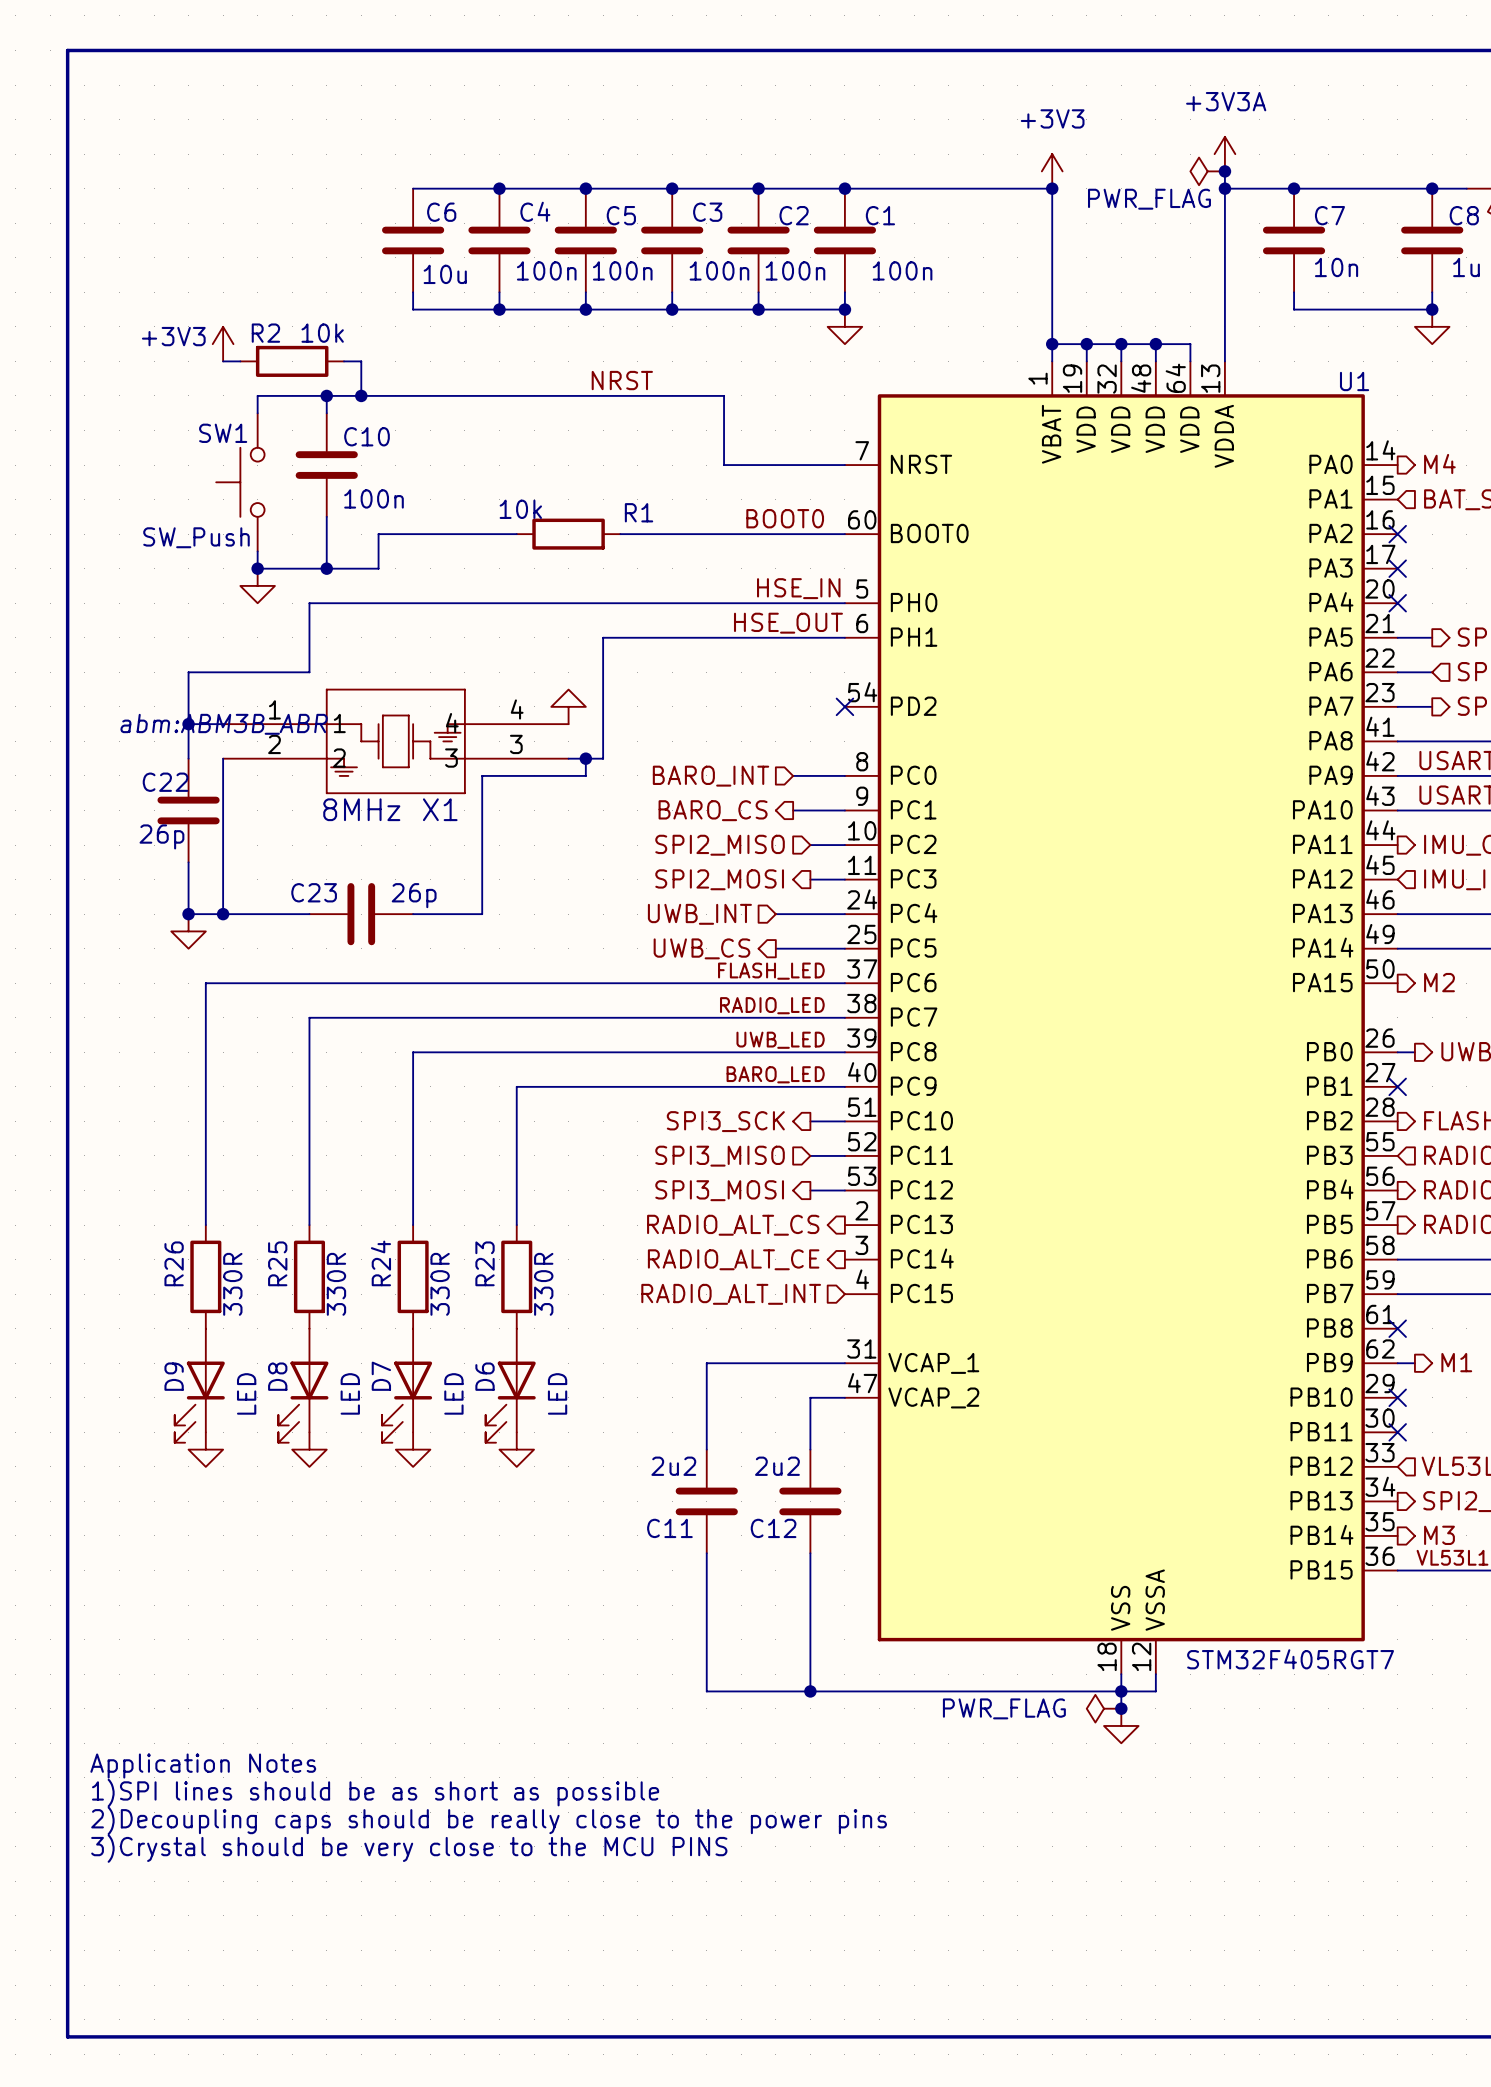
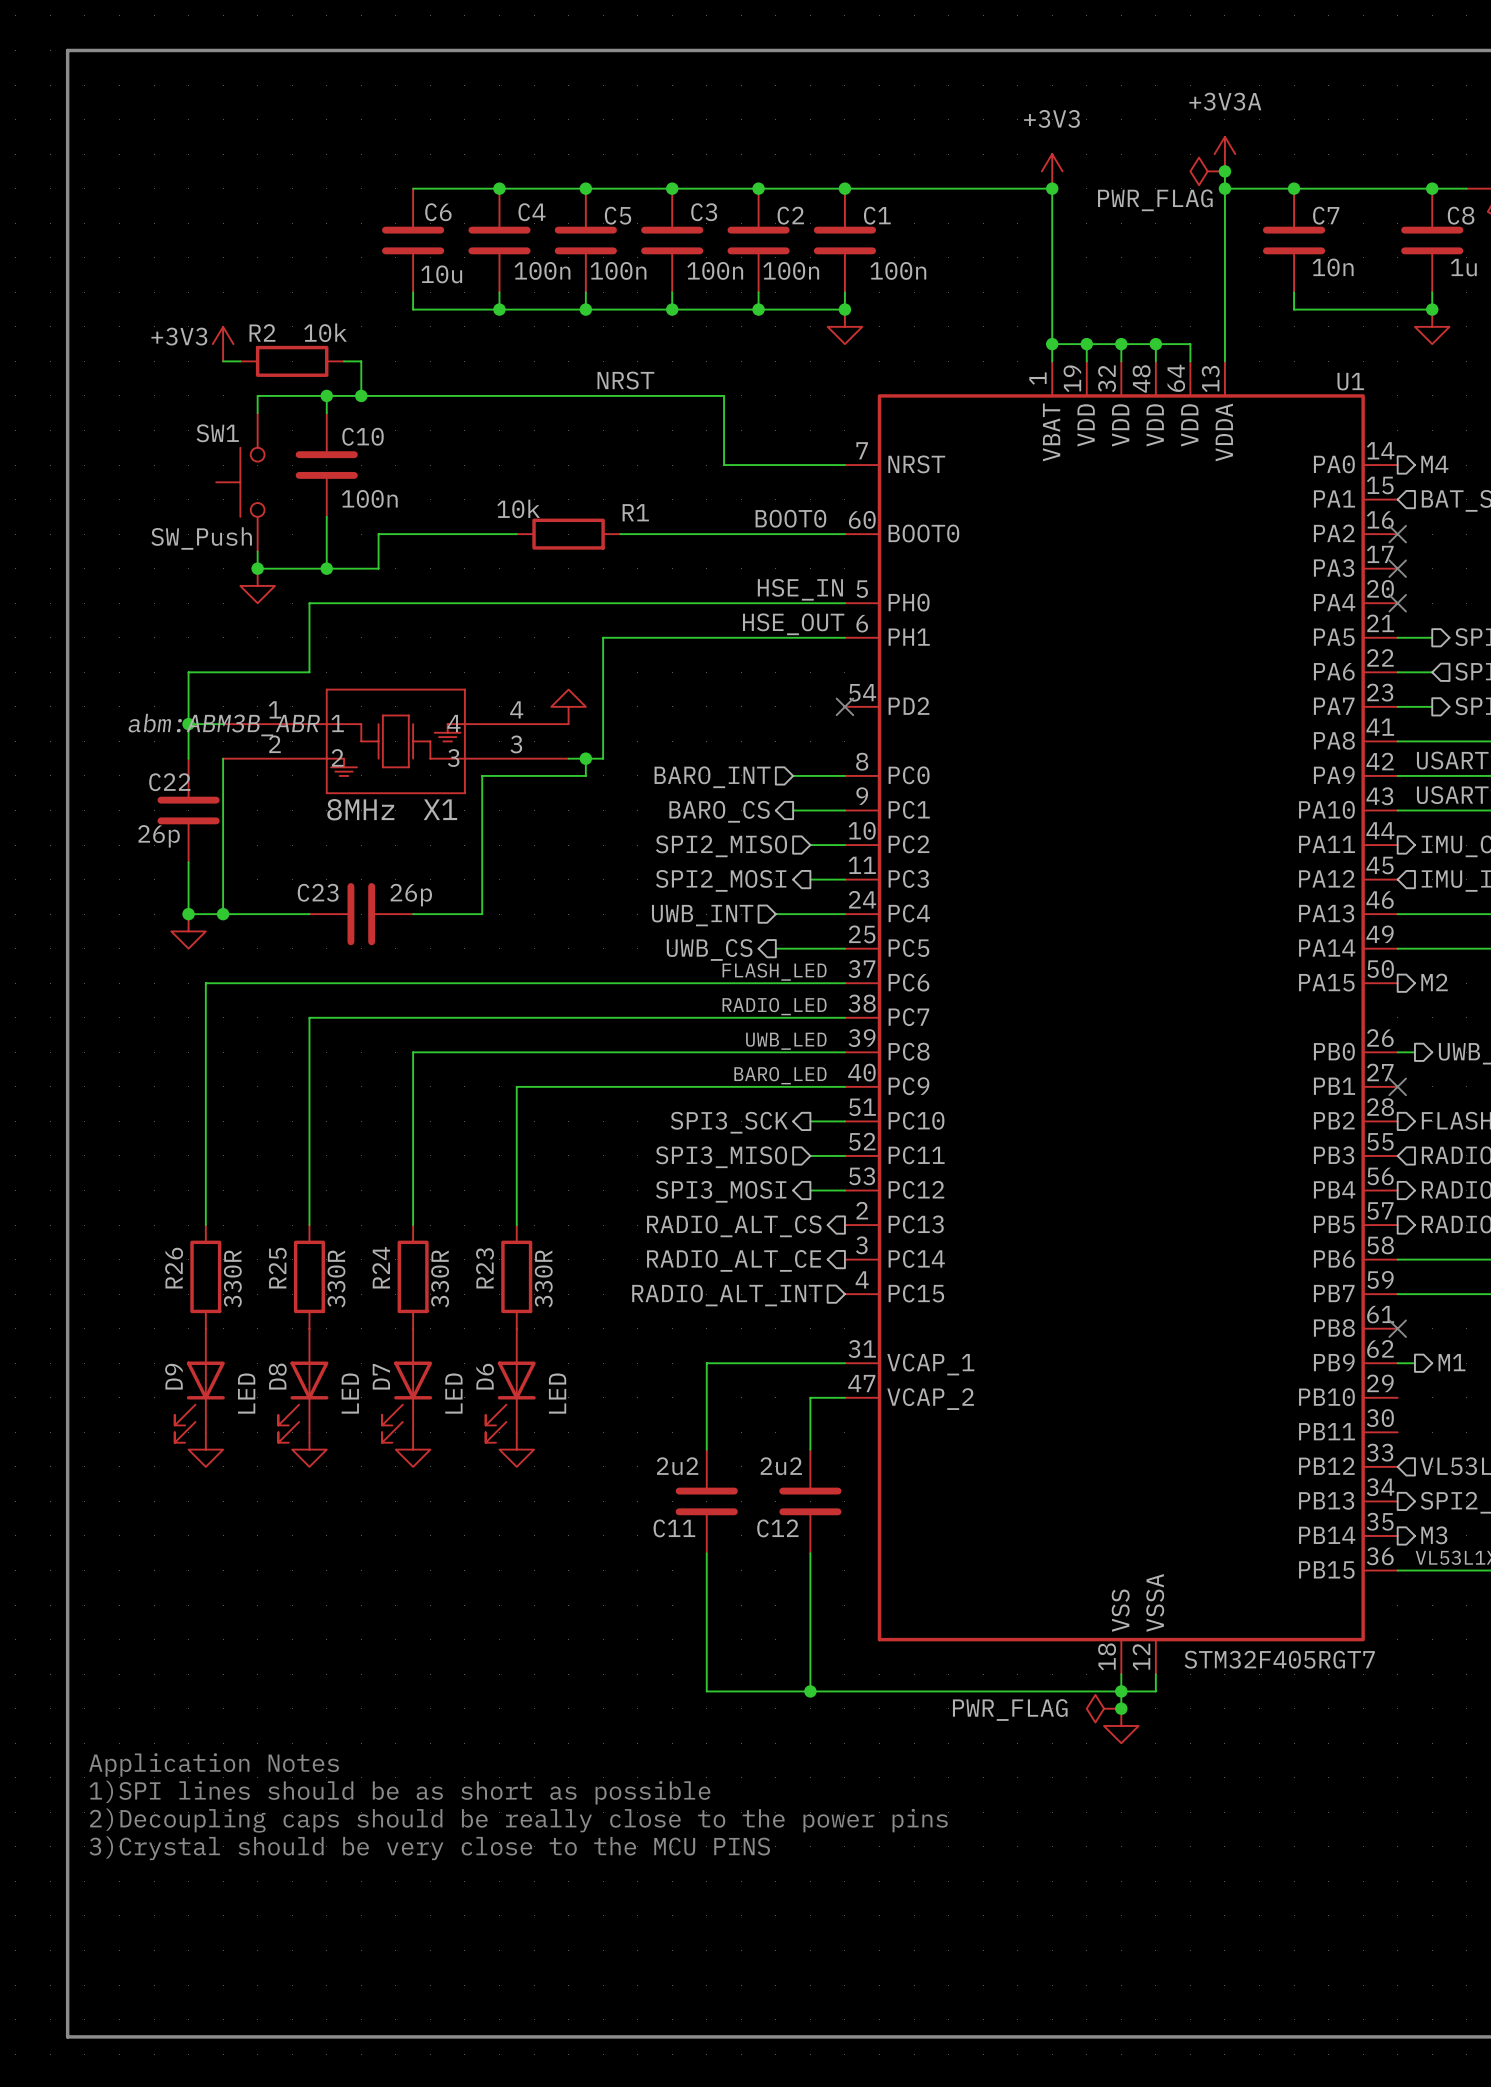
no-connect mark: (1397, 1397) -> none
no-connect mark: (1397, 1432) -> none

